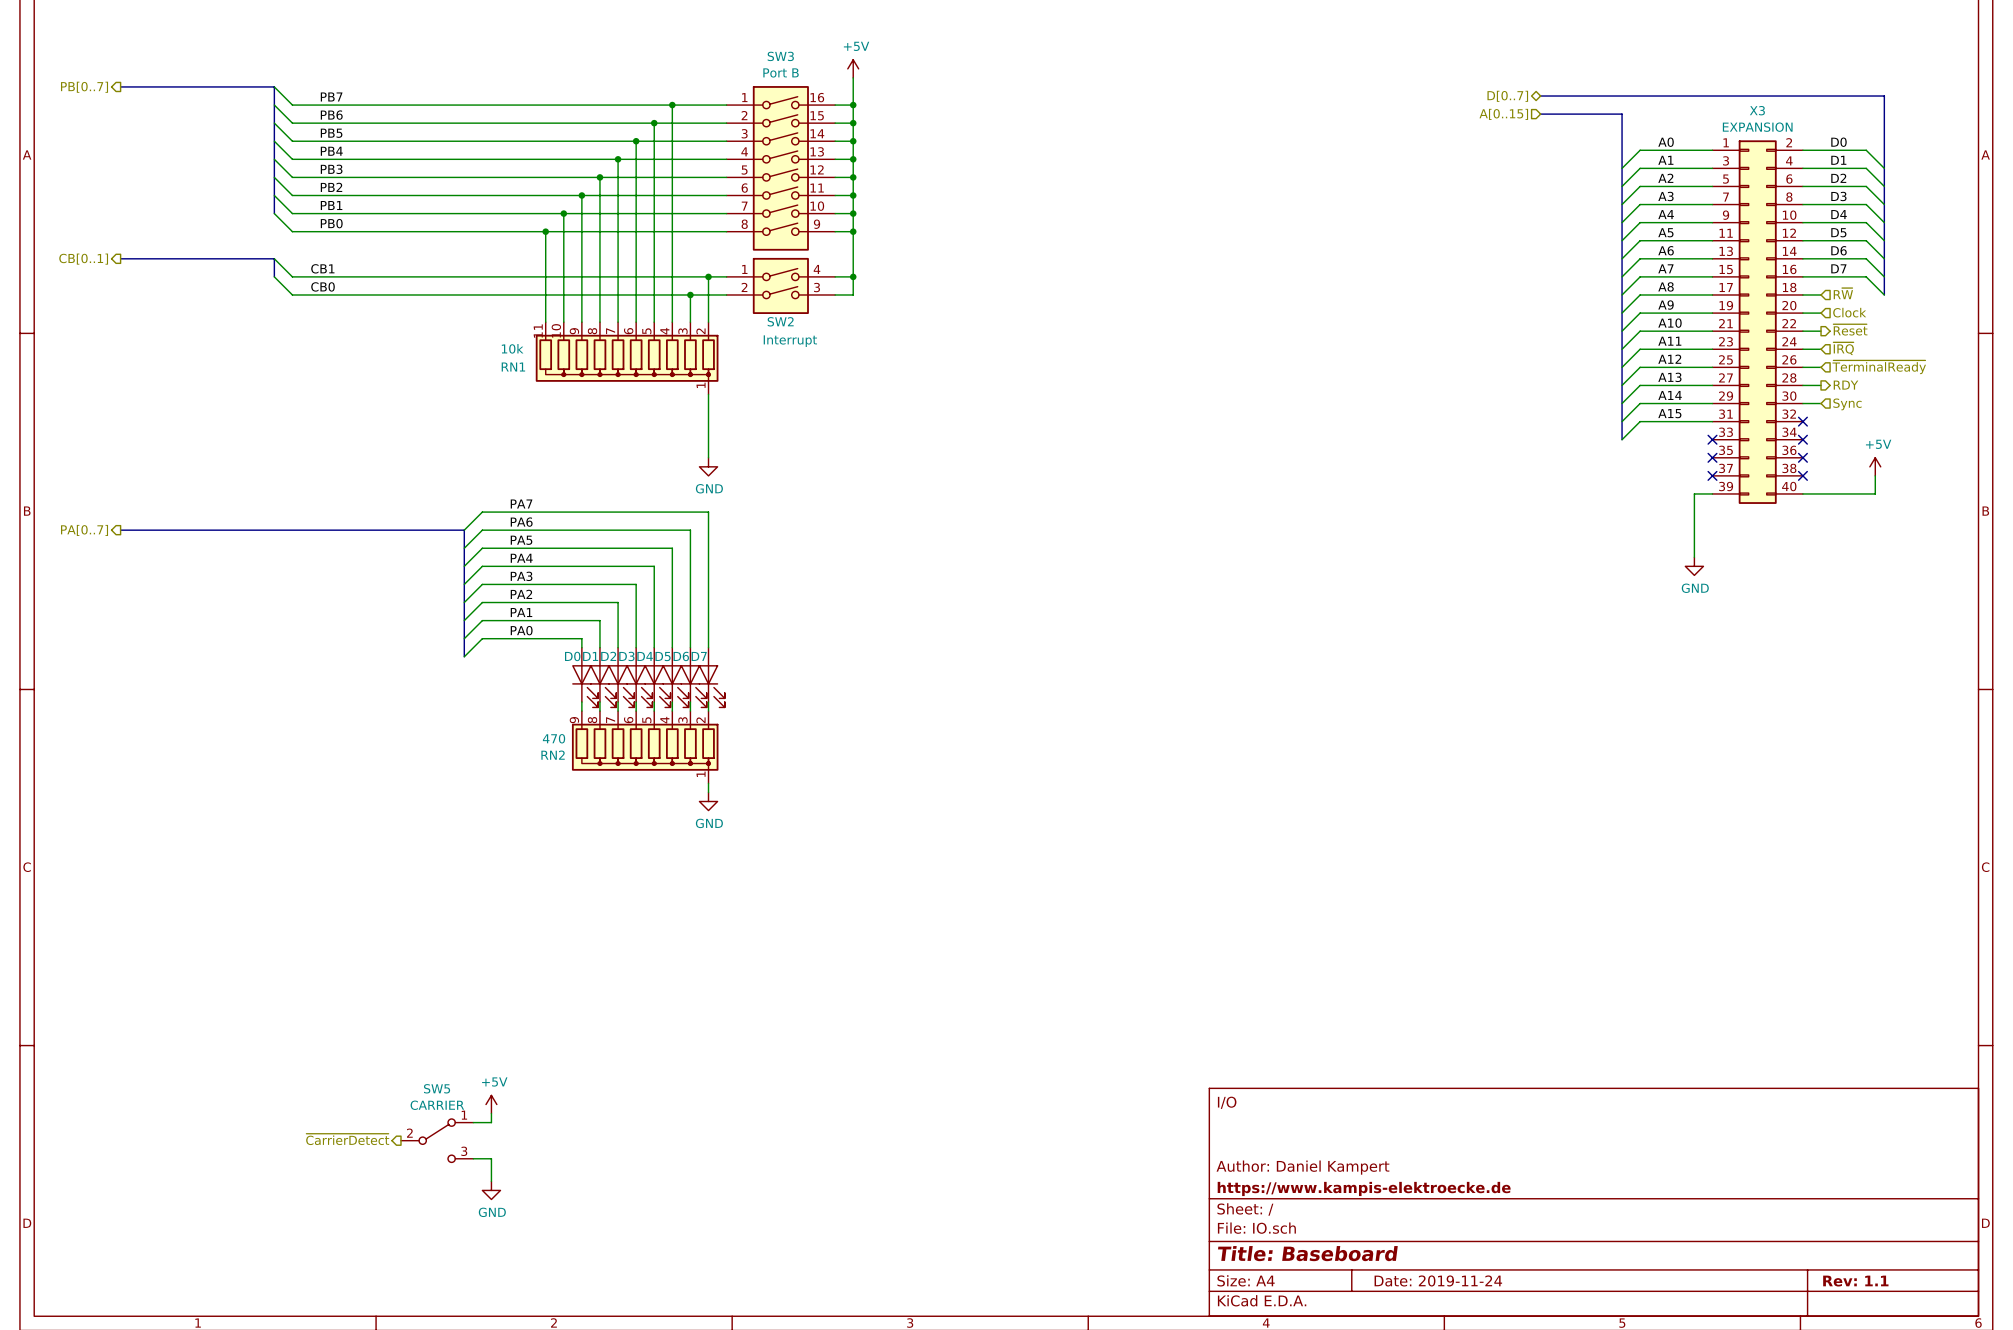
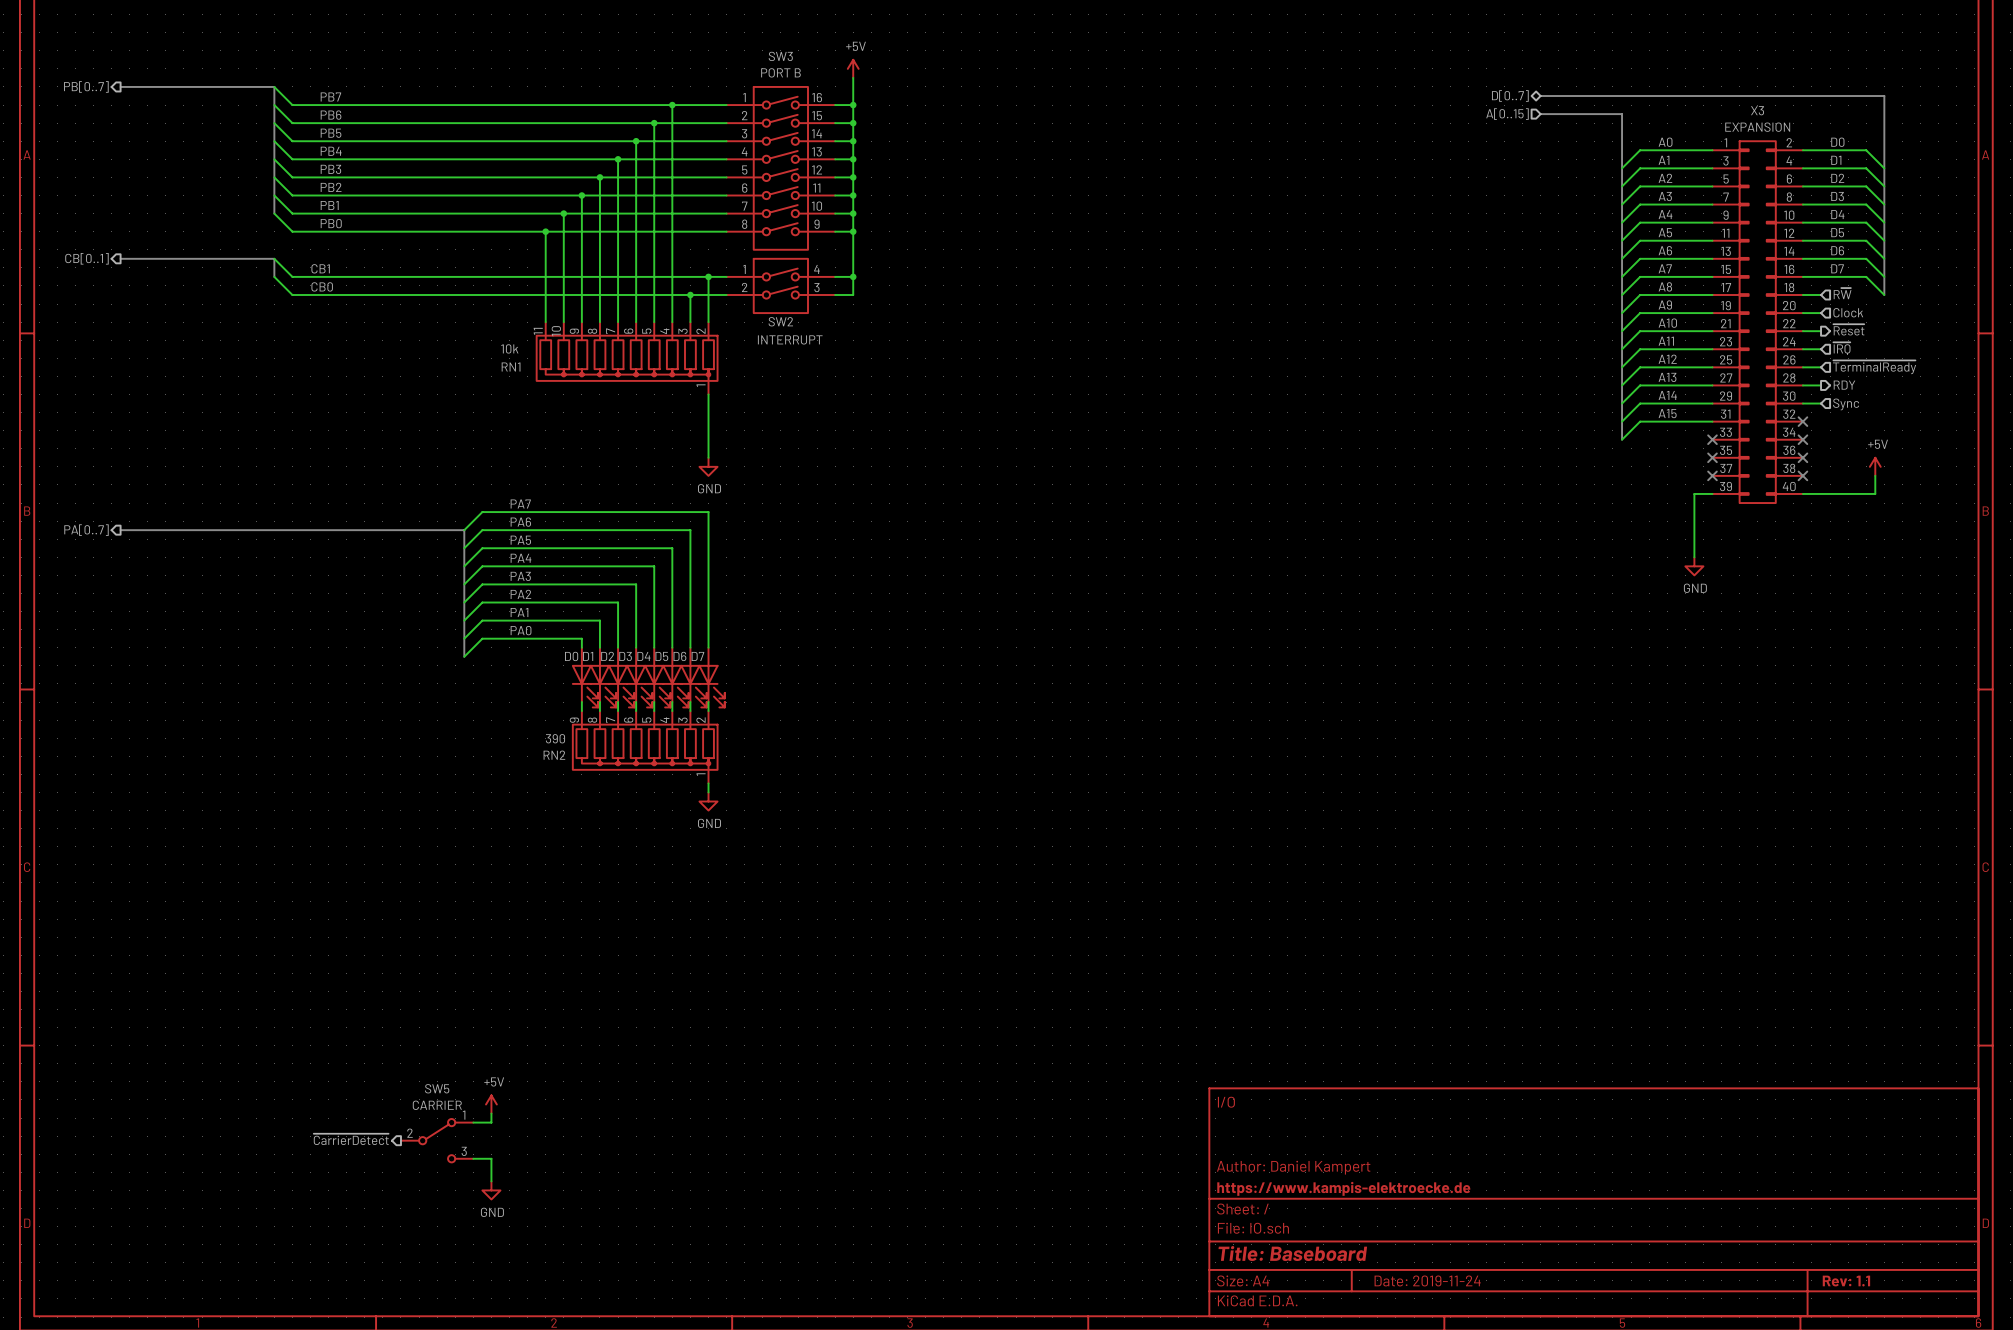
SW3 value: Port B (781, 72) -> PORT B (780, 72)
SW2 value: Interrupt (790, 341) -> INTERRUPT (790, 339)
RN2 value: 470 (554, 738) -> 390 (555, 738)

